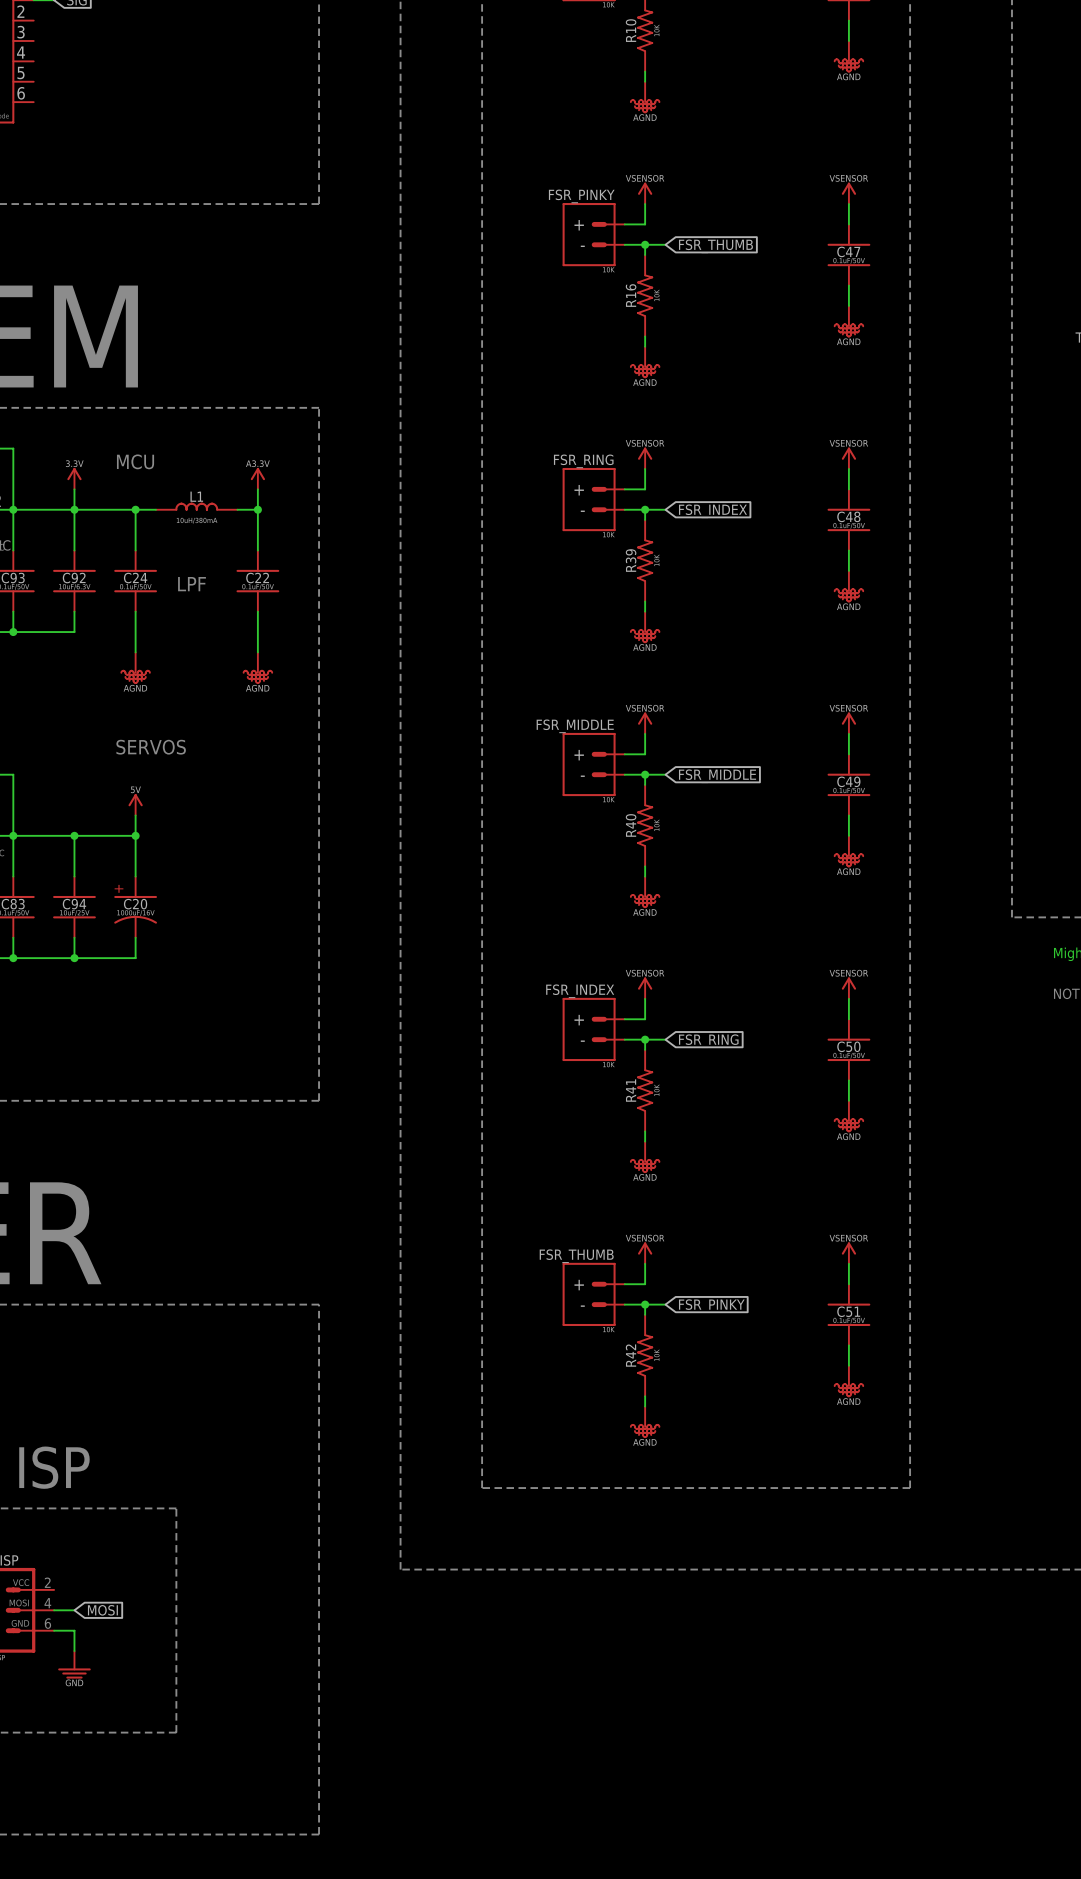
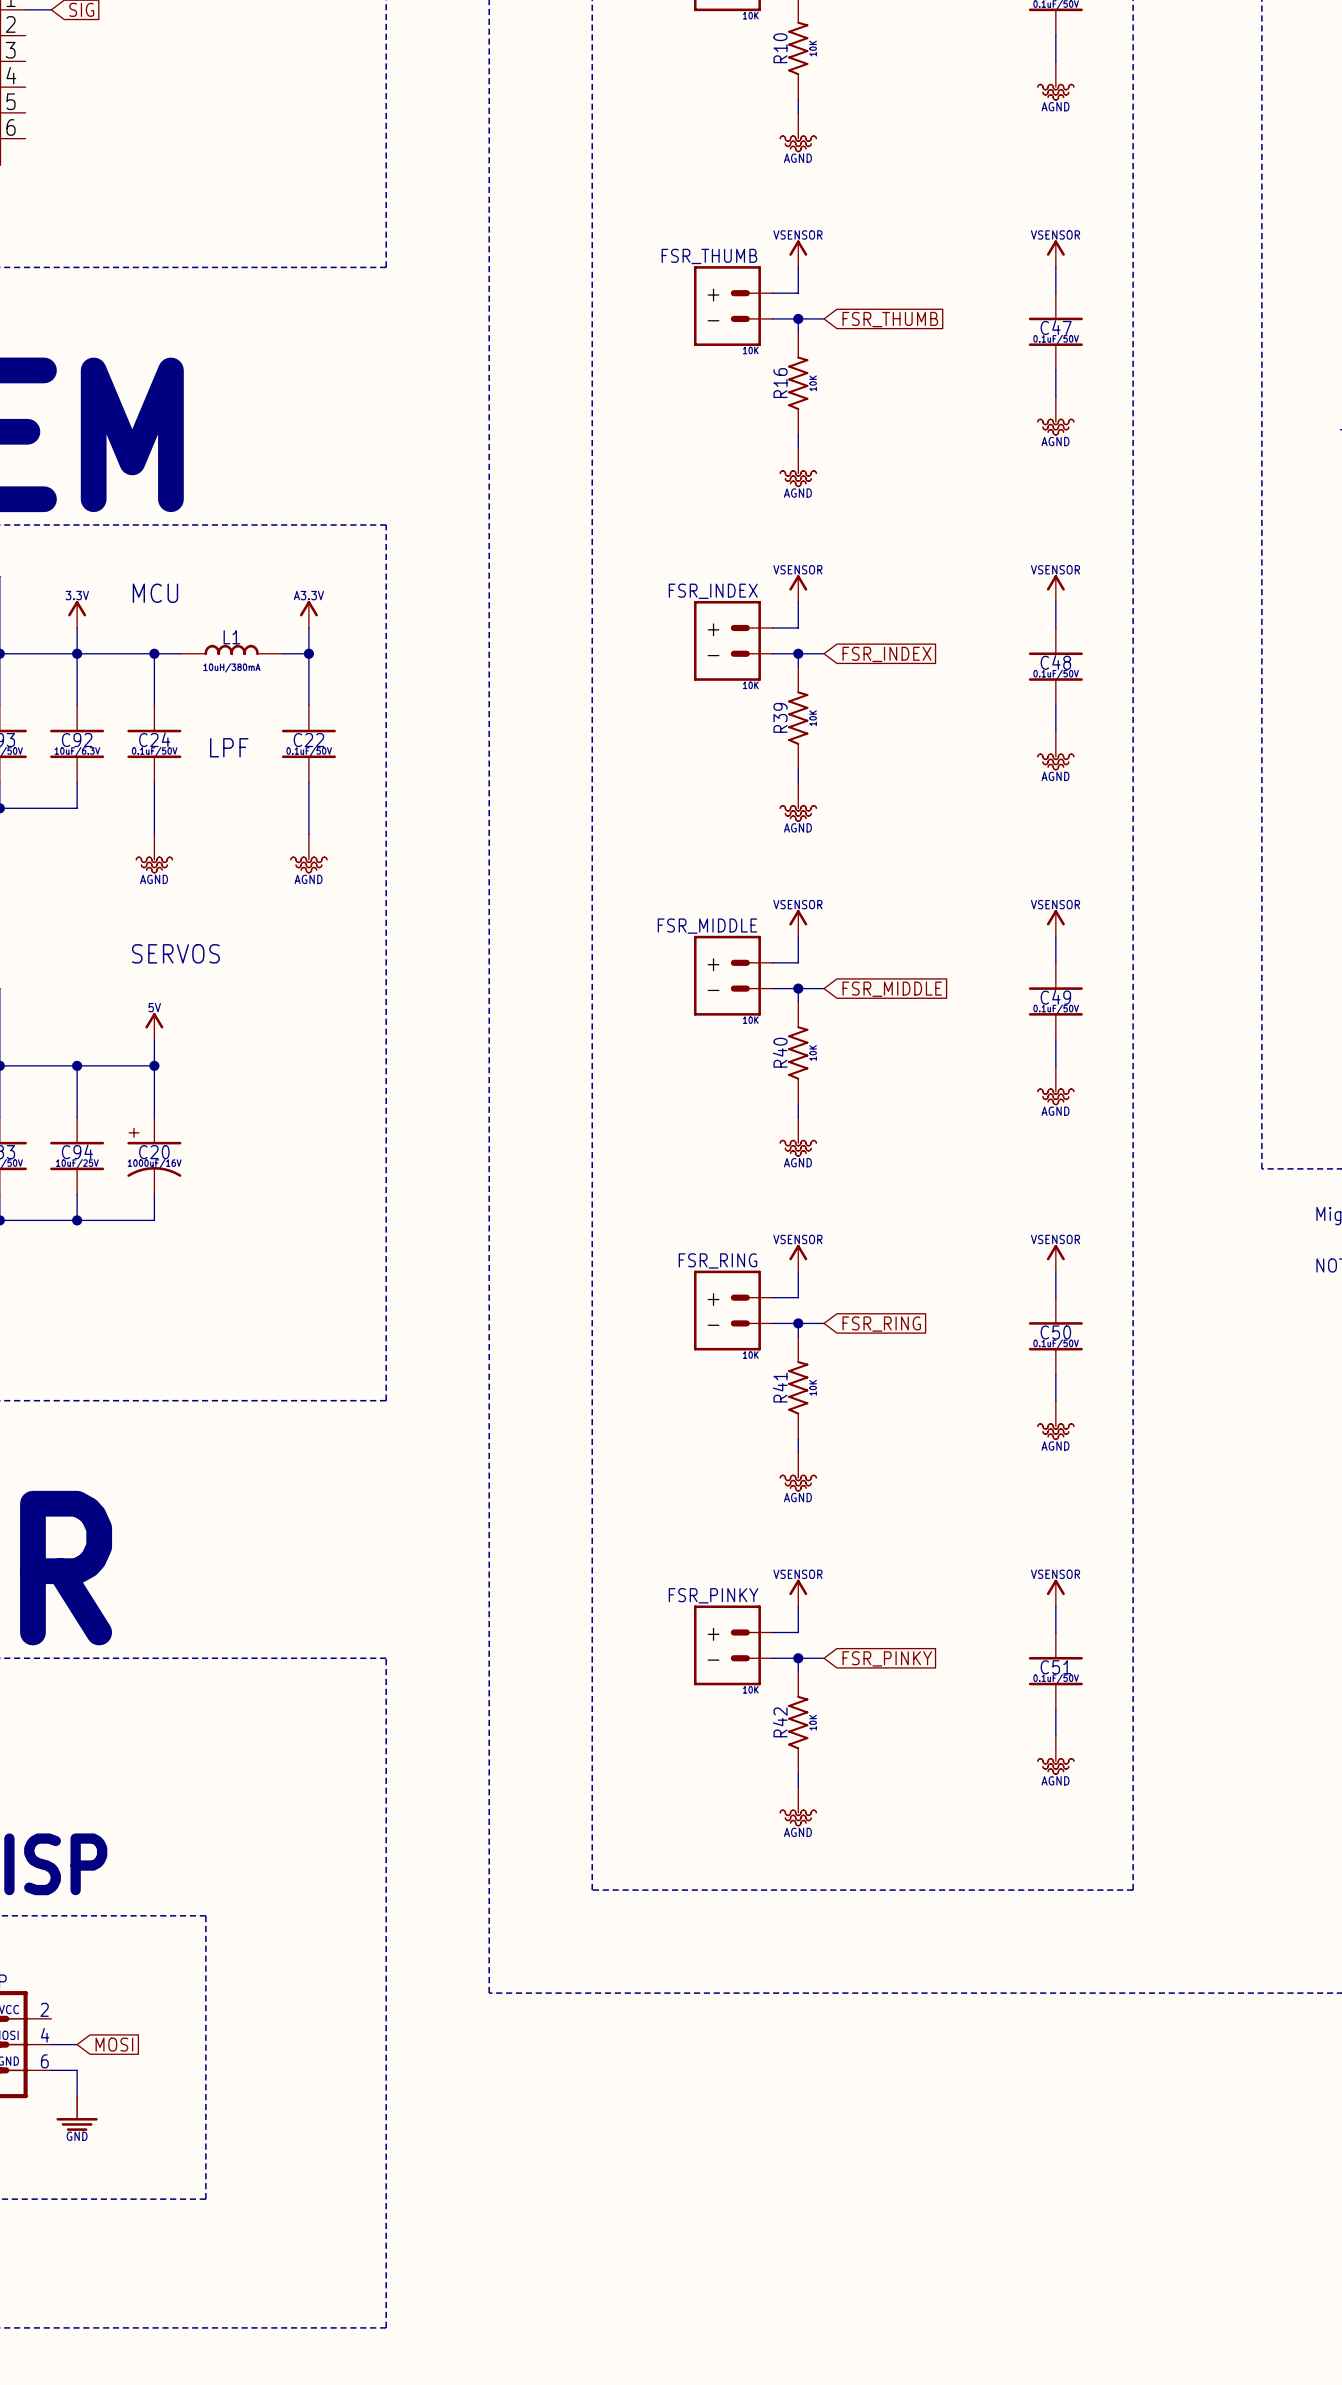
FSR_PINKY name: FSR_PINKY (581, 196) -> FSR_THUMB (709, 256)
FSR_RING name: FSR_RING (583, 461) -> FSR_INDEX (713, 591)
FSR_INDEX name: FSR_INDEX (580, 991) -> FSR_RING (717, 1260)
FSR_THUMB name: FSR_THUMB (576, 1256) -> FSR_PINKY (713, 1595)

